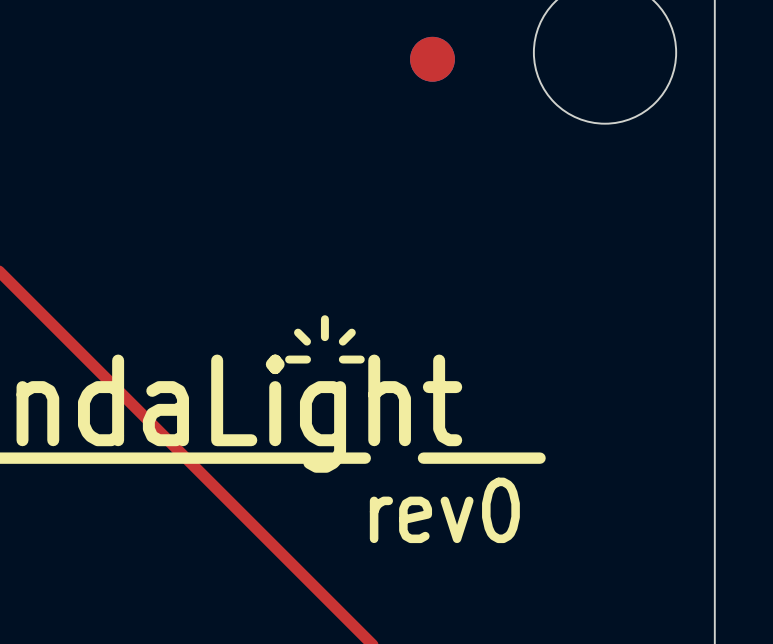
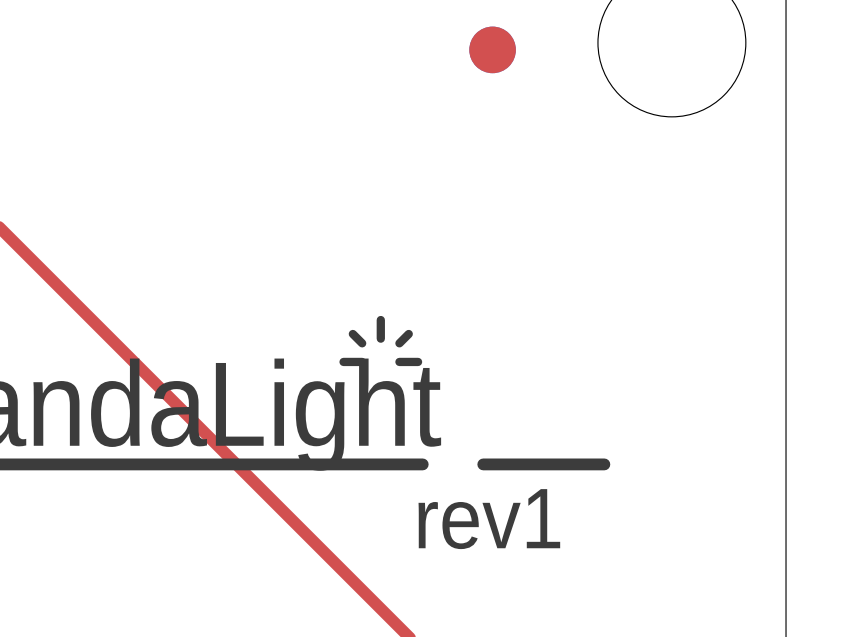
text: rev0 (444, 510) -> rev1 (489, 519)

